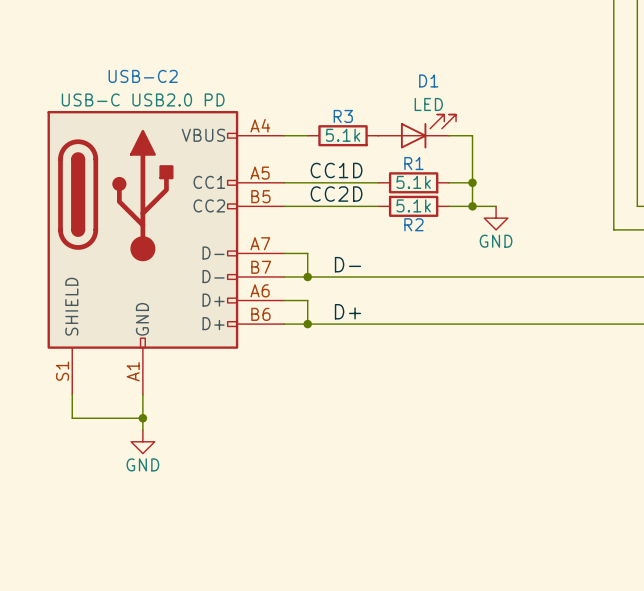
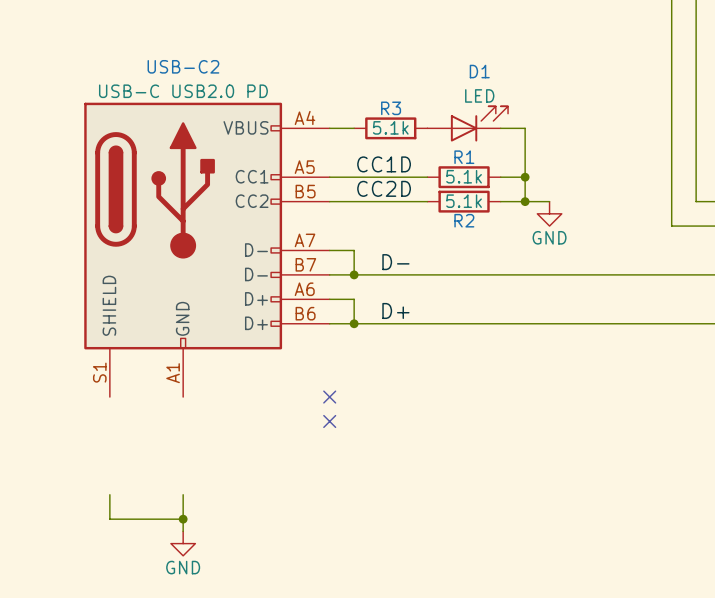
wire: (72, 394) (72, 418) (142, 418) -> (109, 494) (109, 519) (183, 519)
wire: (142, 394) (142, 430) -> (183, 494) (183, 531)
no-connect mark: none -> (329, 397)
junction: (142, 418) -> none
no-connect mark: none -> (329, 421)
power symbol position: GND (142, 441) -> GND (183, 543)
junction: none -> (183, 519)

